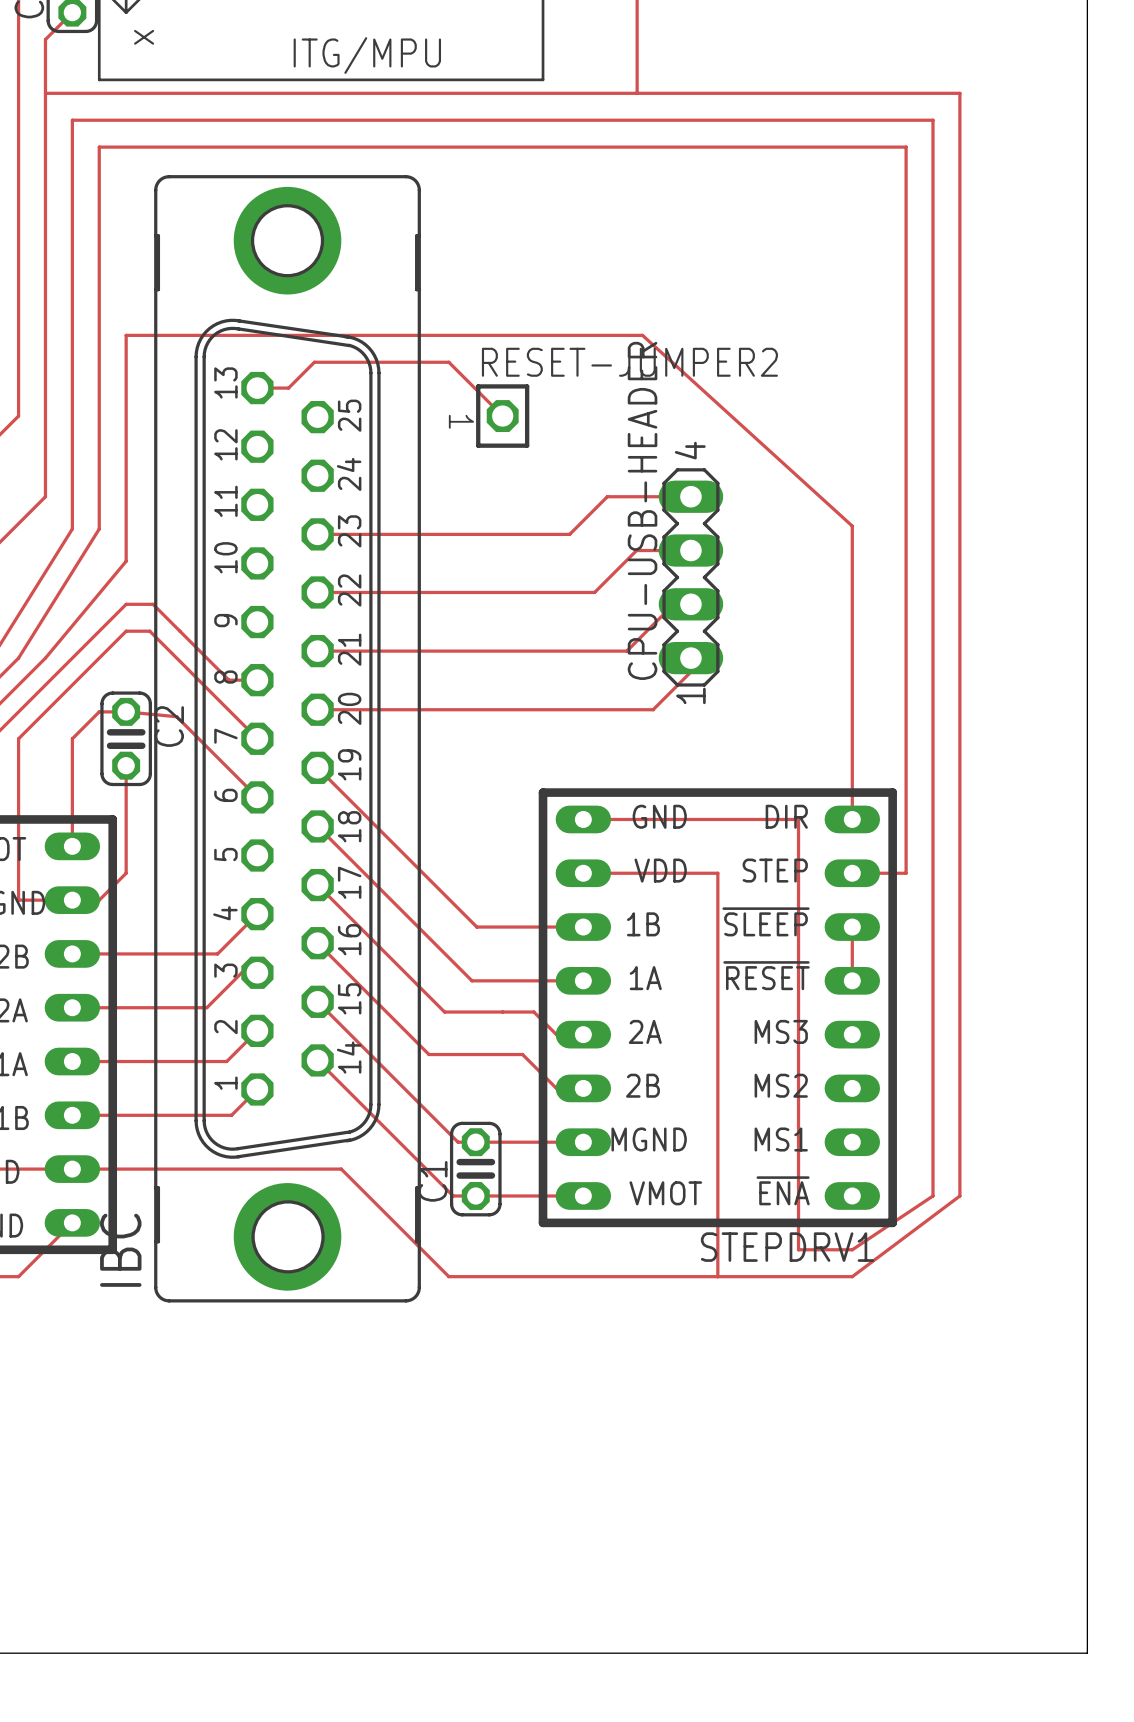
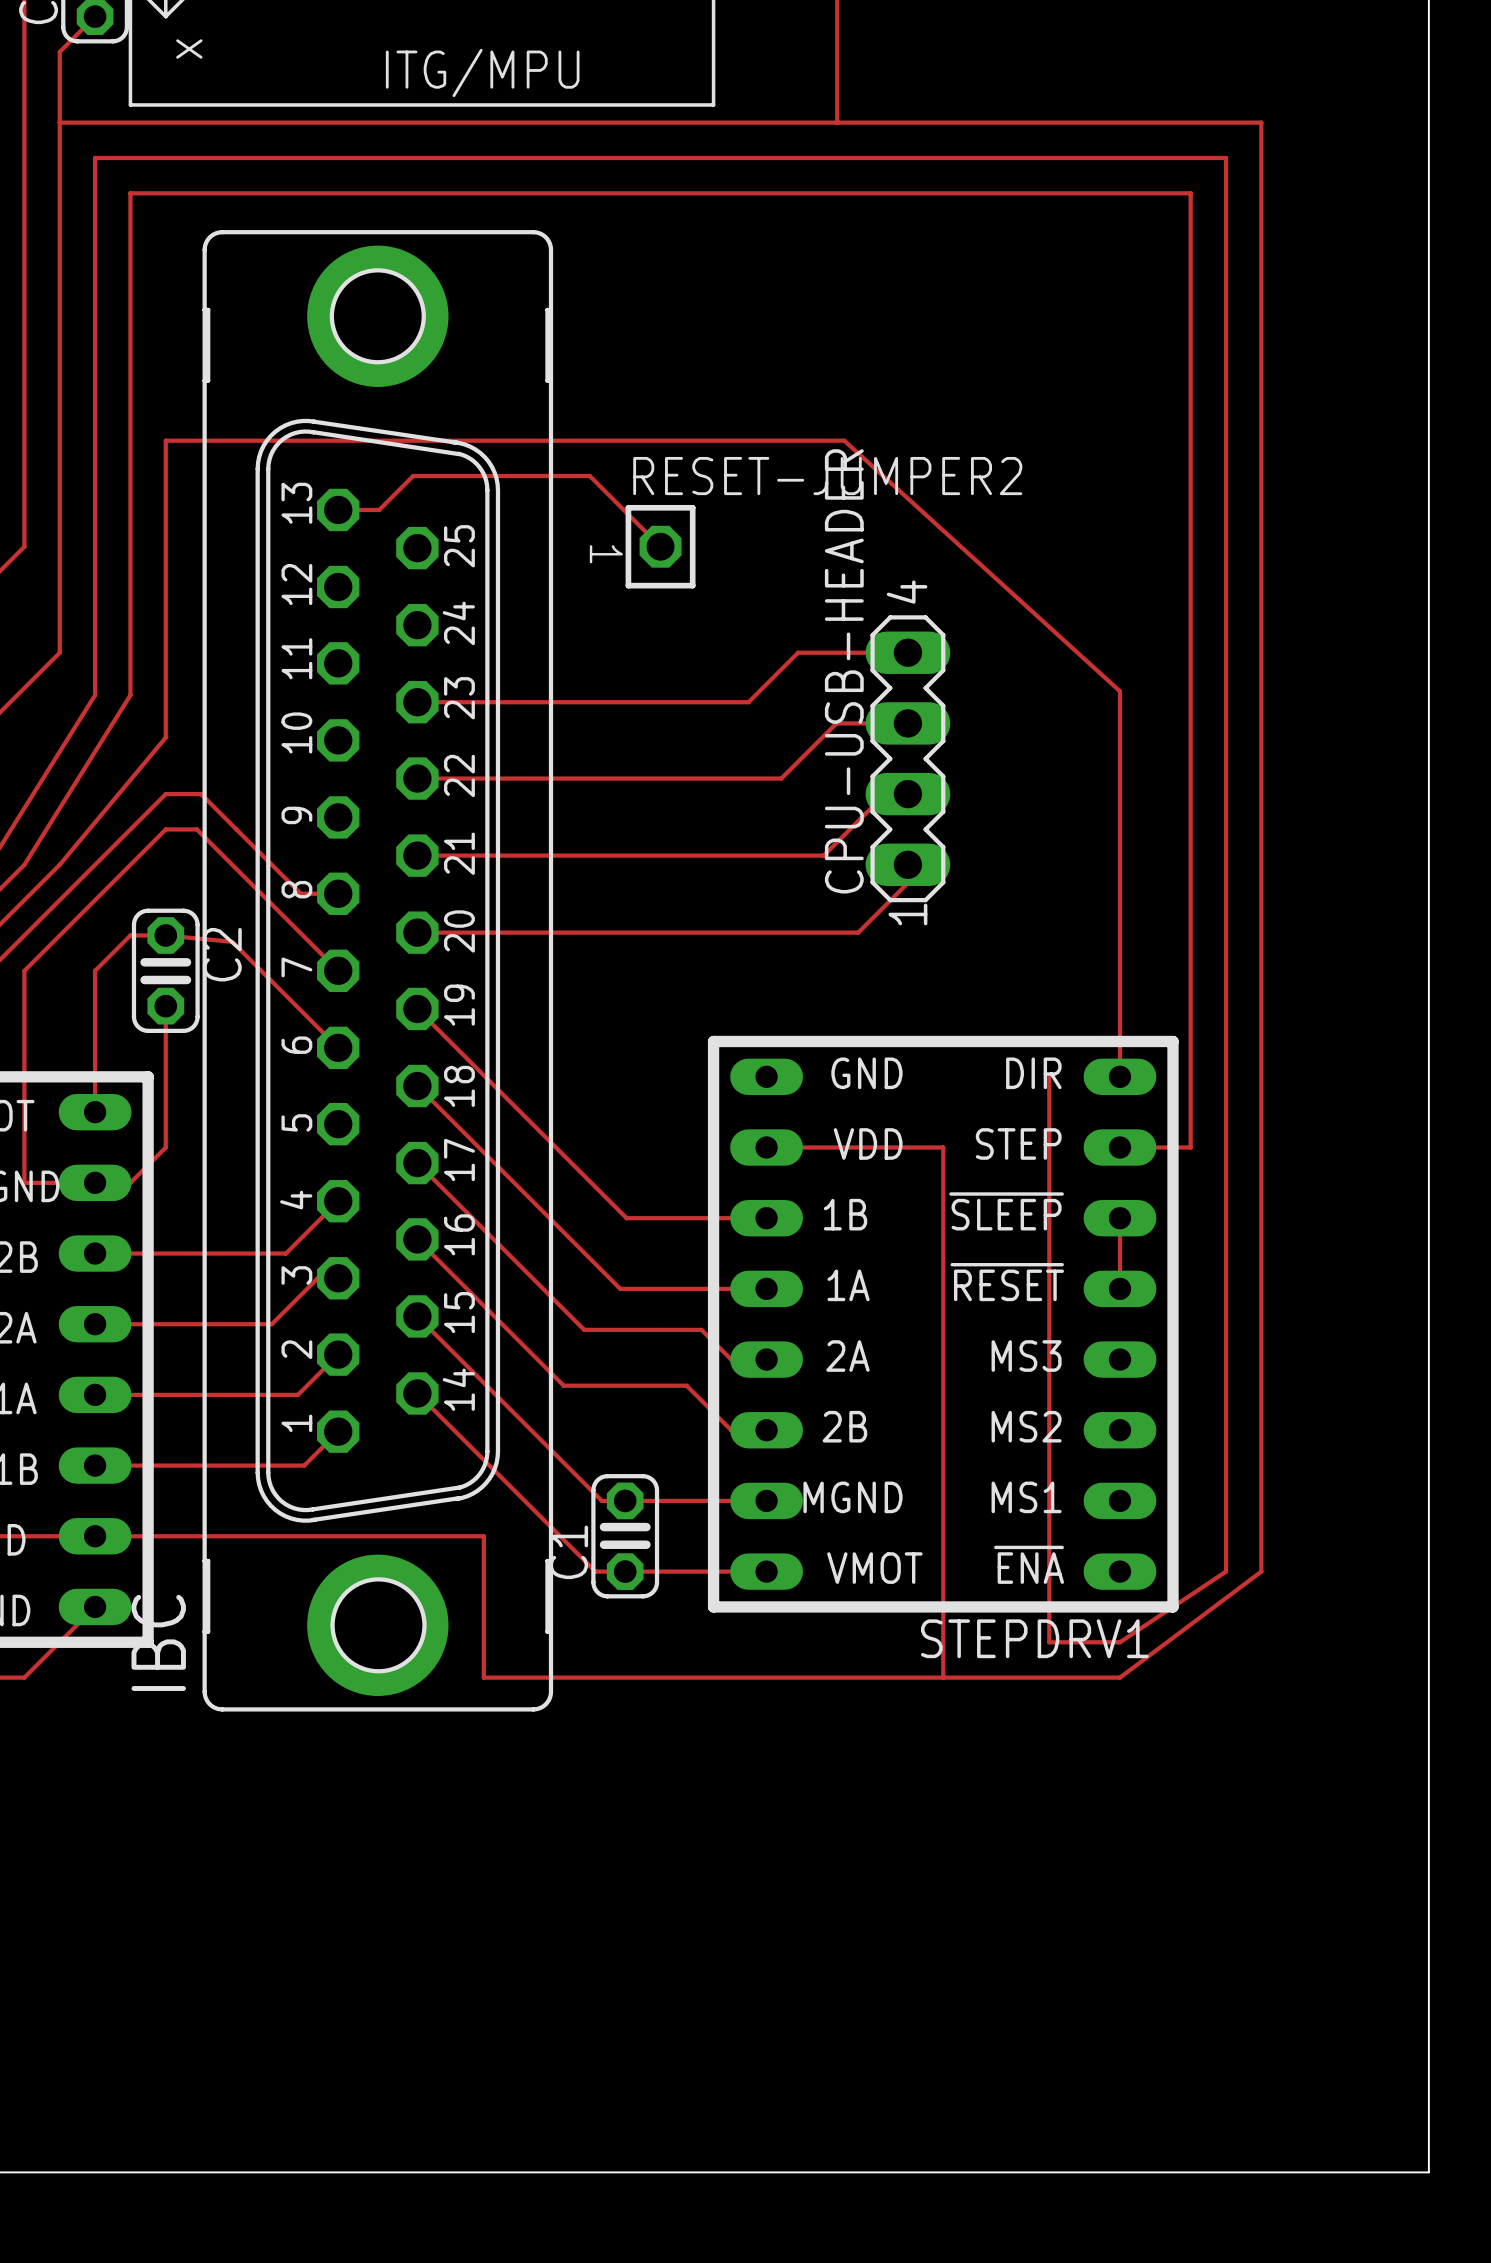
track: (583, 819) (798, 819) -> none
track: (341, 1169) (448, 1276) -> (448, 1536) (483, 1536) (483, 1677) (589, 1677)

